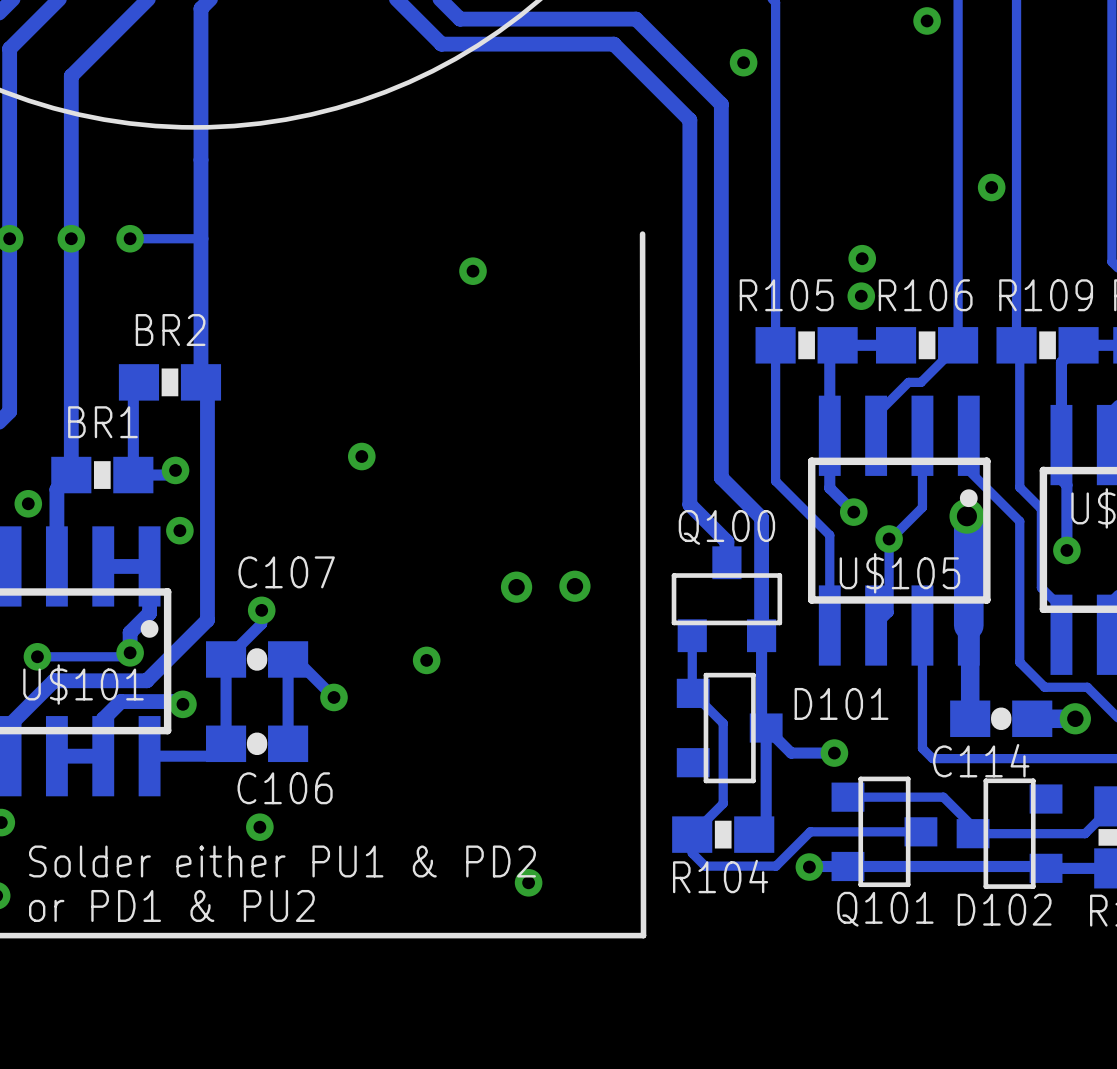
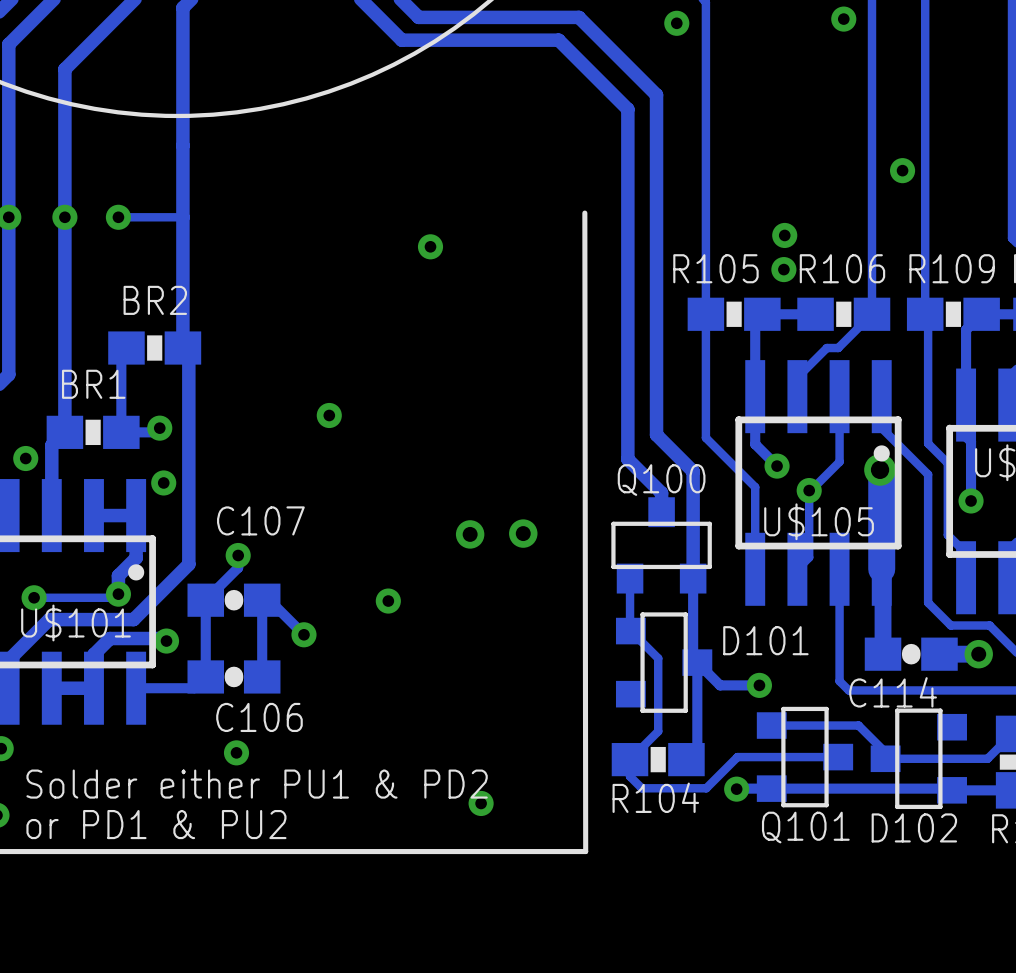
via position: (743, 62) -> (676, 23)

